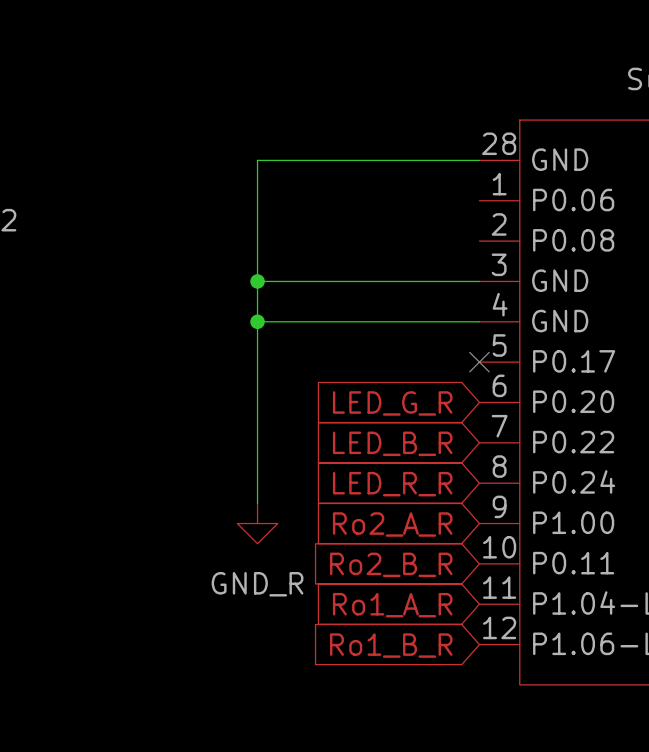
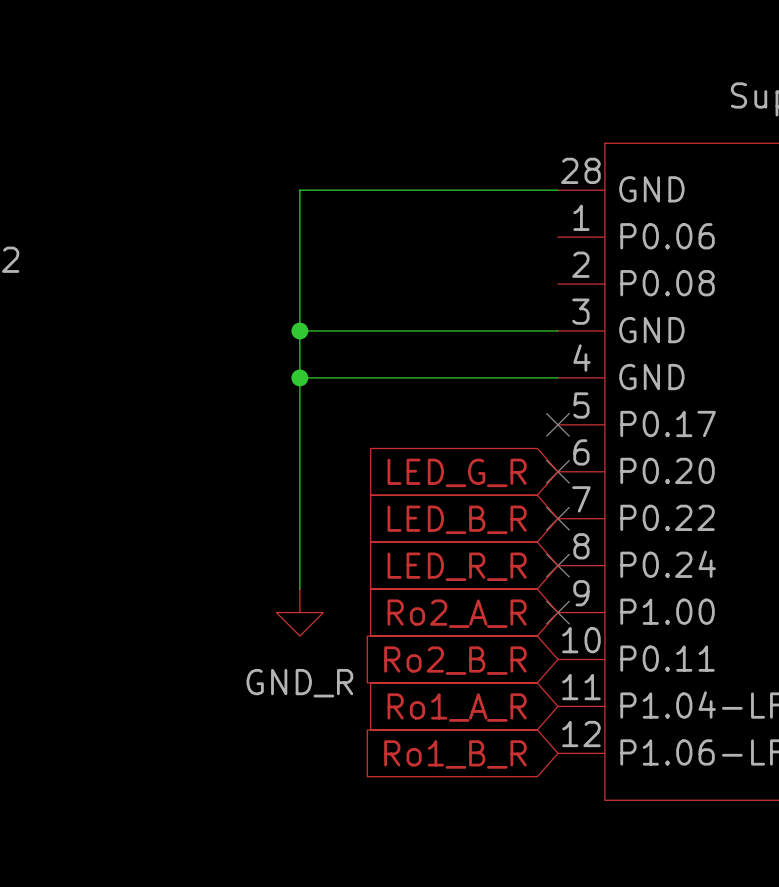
no-connect mark: none -> (557, 471)
no-connect mark: none -> (557, 518)
no-connect mark: none -> (557, 565)
no-connect mark: none -> (557, 612)

